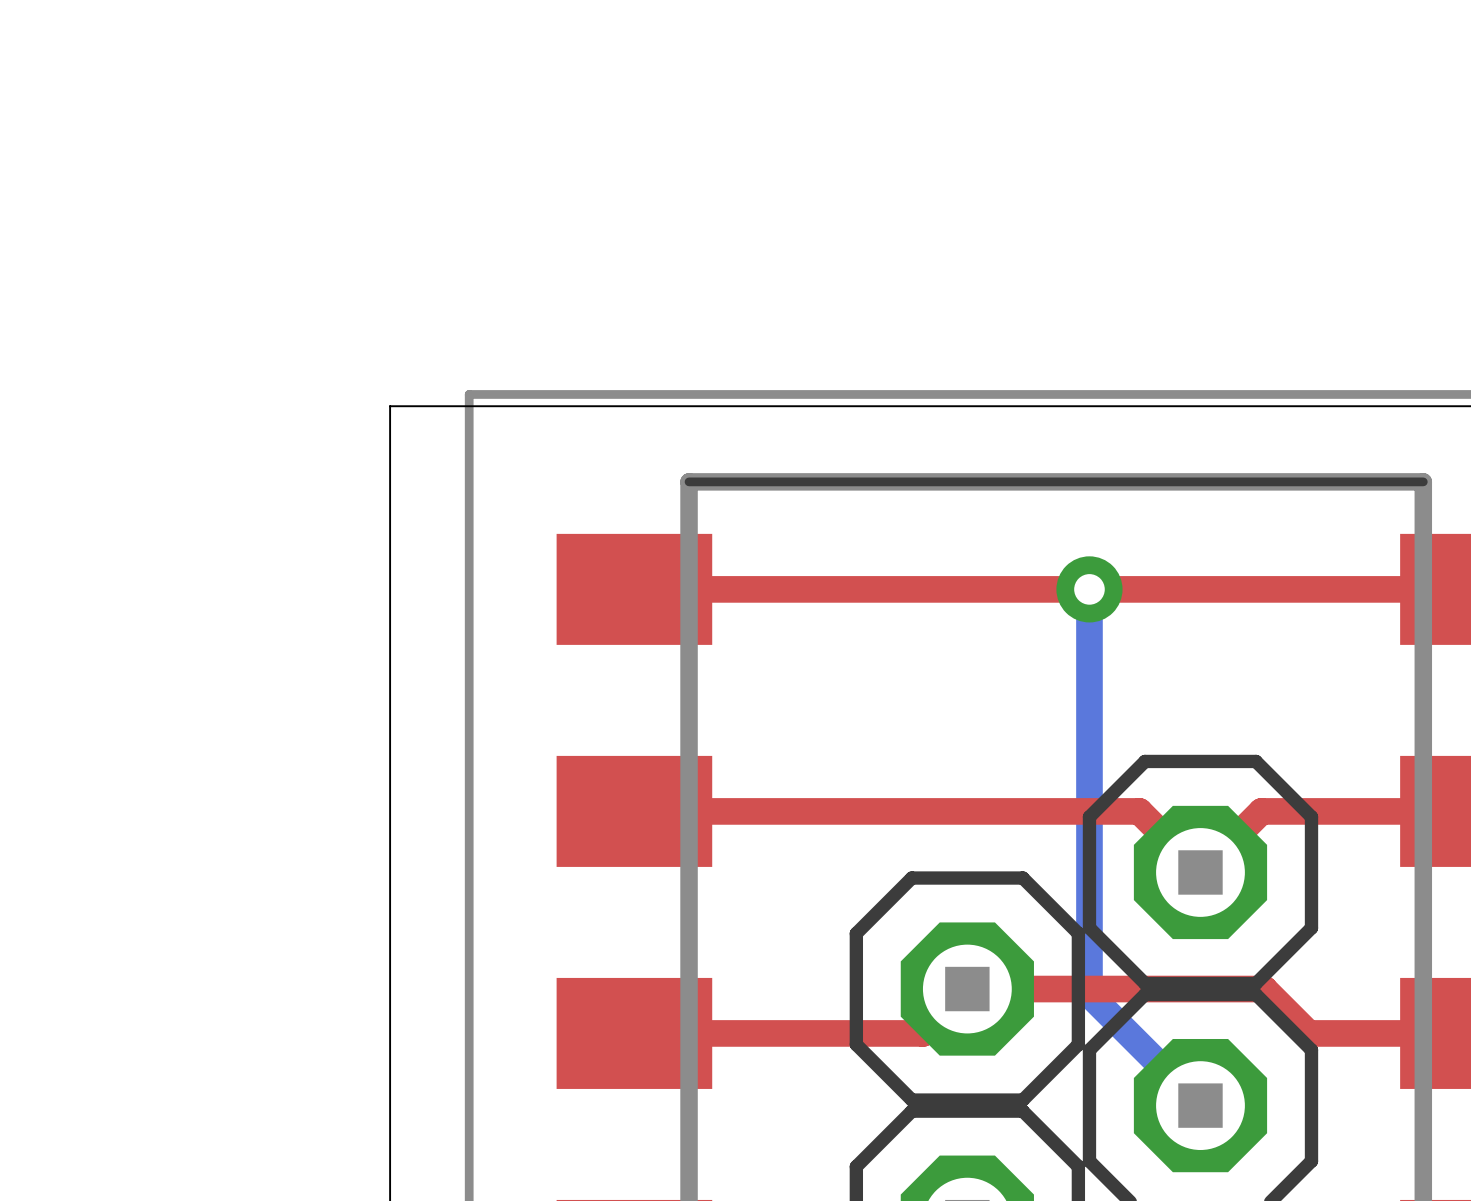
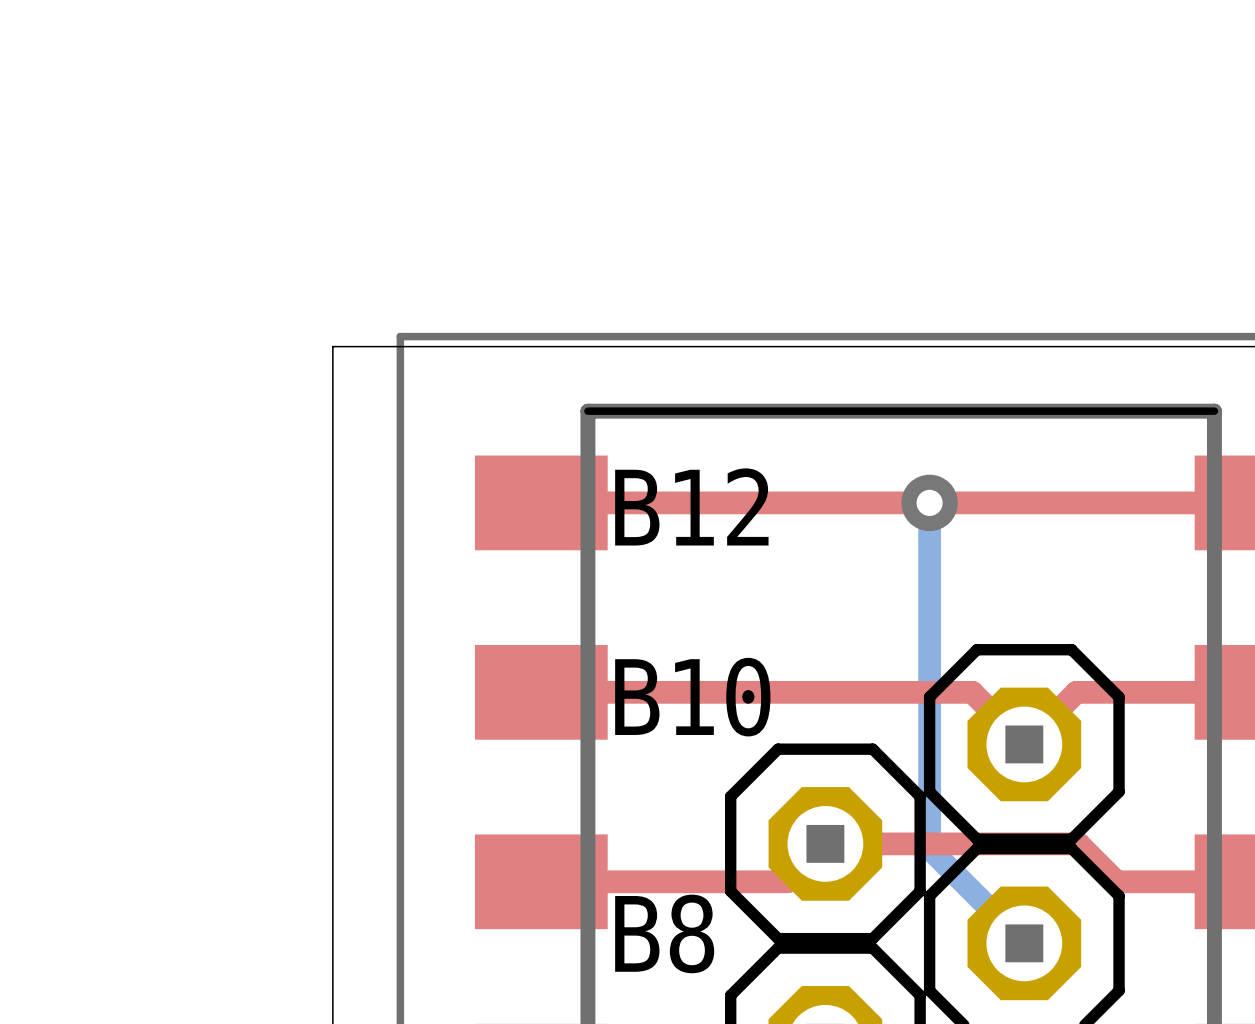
text: none -> B12 (691, 506)
text: none -> B10 (692, 697)
text: none -> B8 (664, 933)

